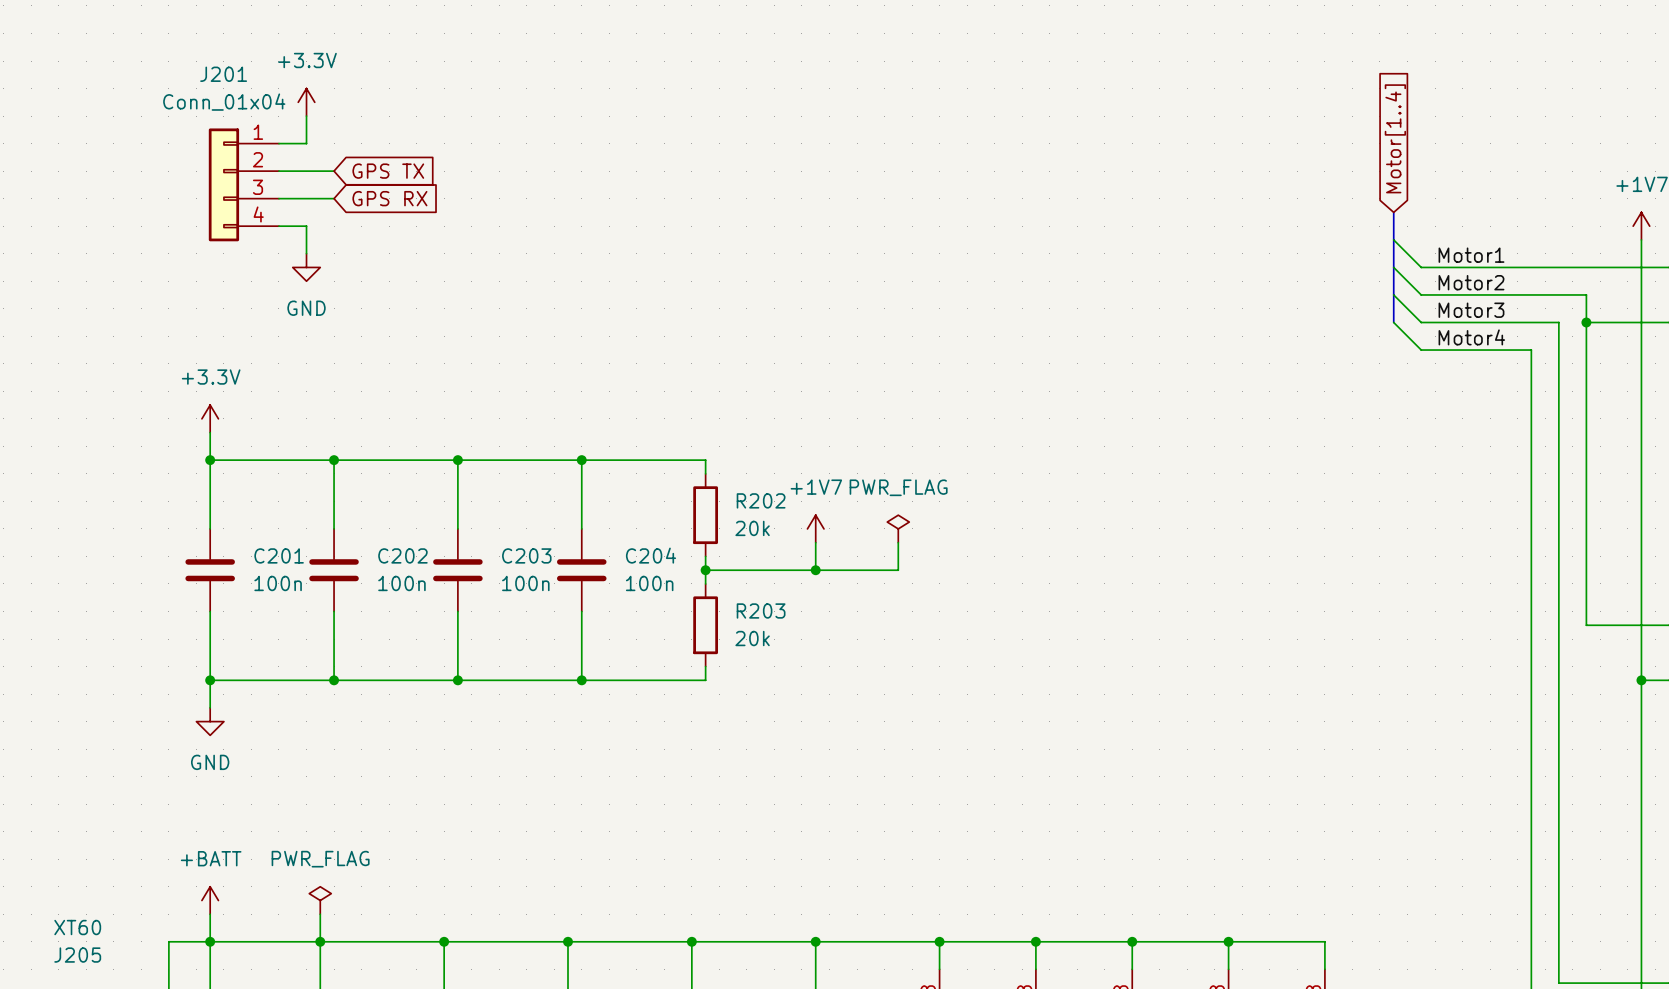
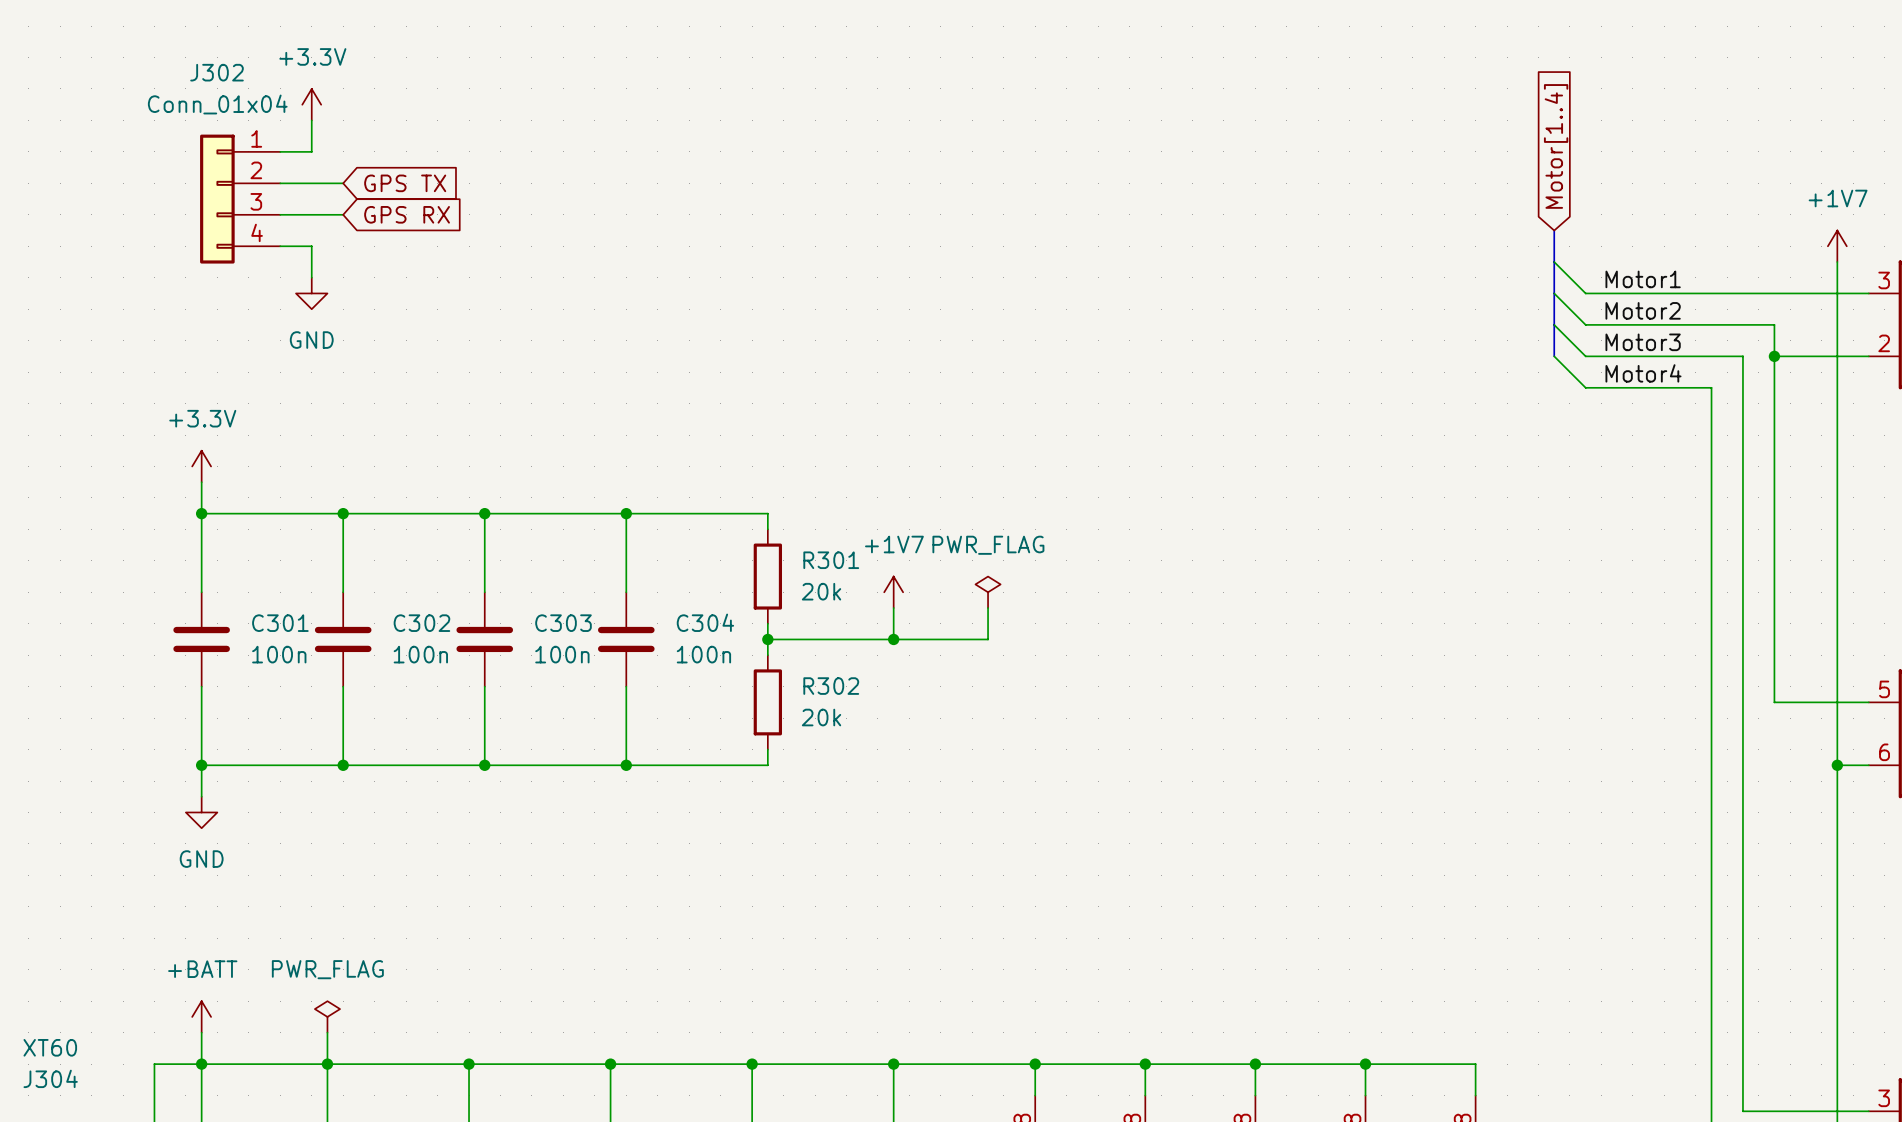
J201 name: J201 (223, 74) -> J302 (217, 72)
R202 name: R202 (761, 500) -> R301 (831, 560)
C201 name: C201 (279, 555) -> C301 (280, 623)
C202 name: C202 (402, 555) -> C302 (421, 623)
C203 name: C203 (526, 555) -> C303 (563, 623)
C204 name: C204 (651, 555) -> C304 (705, 622)
R203 name: R203 (761, 610) -> R302 (831, 686)
J205 name: J205 (77, 955) -> J304 (50, 1078)

